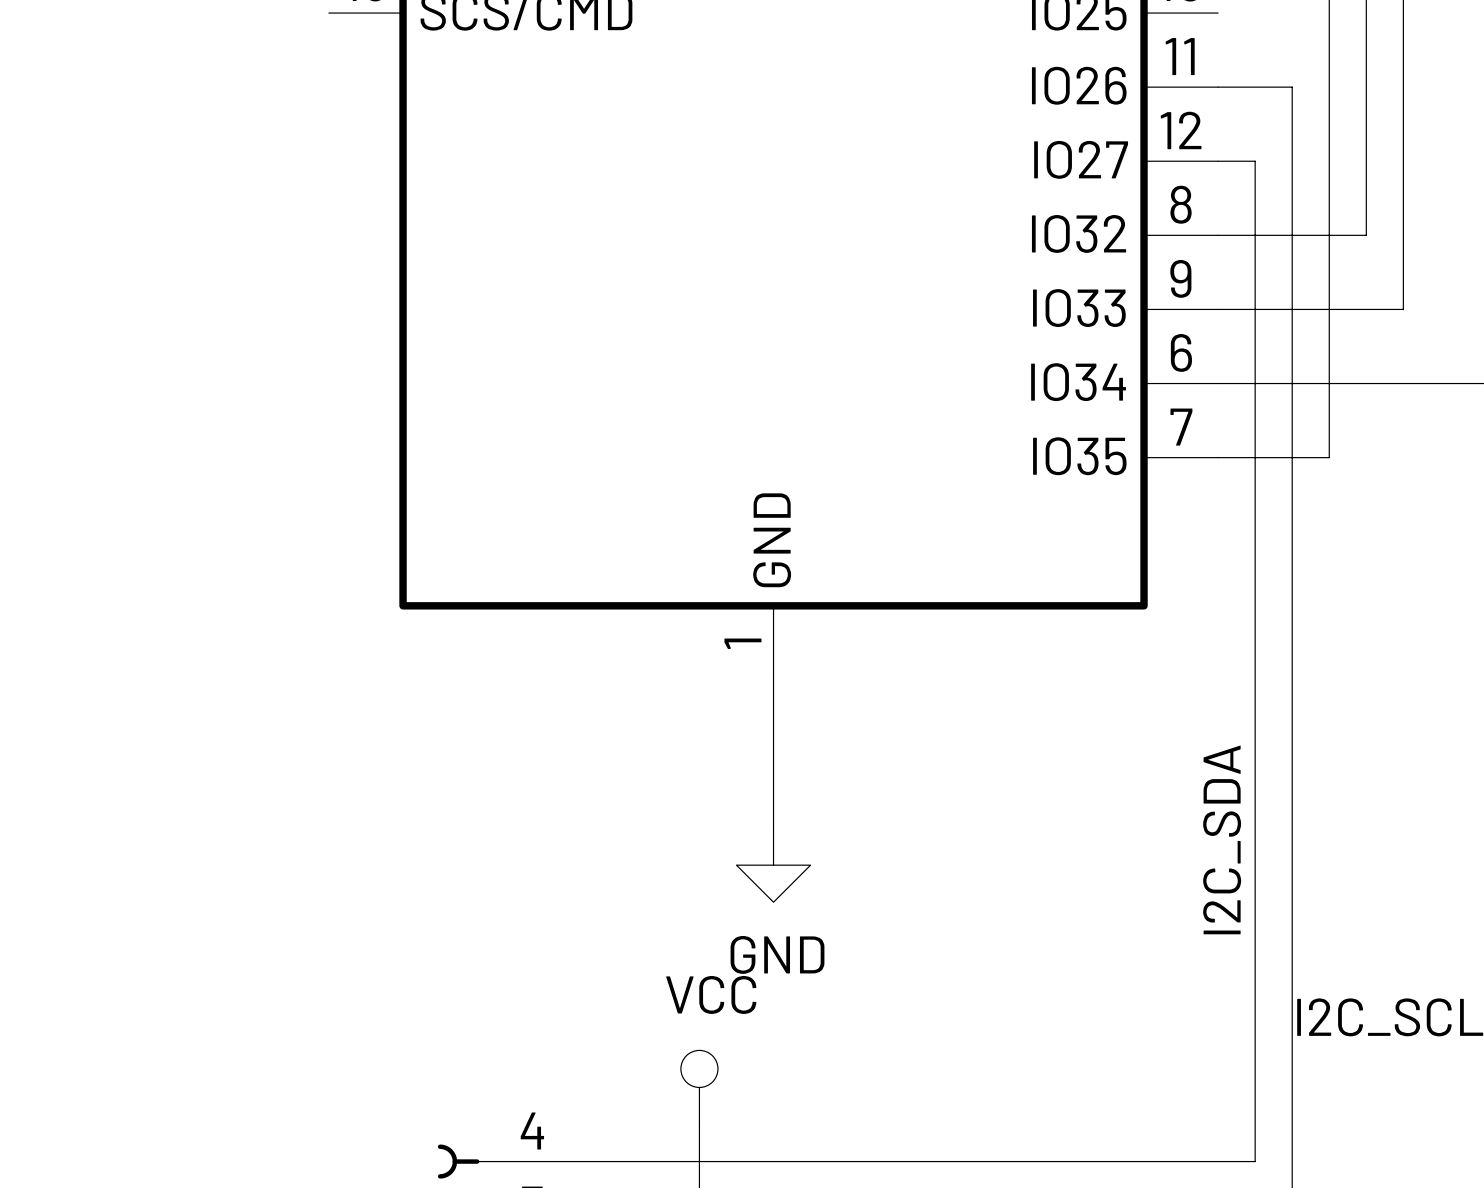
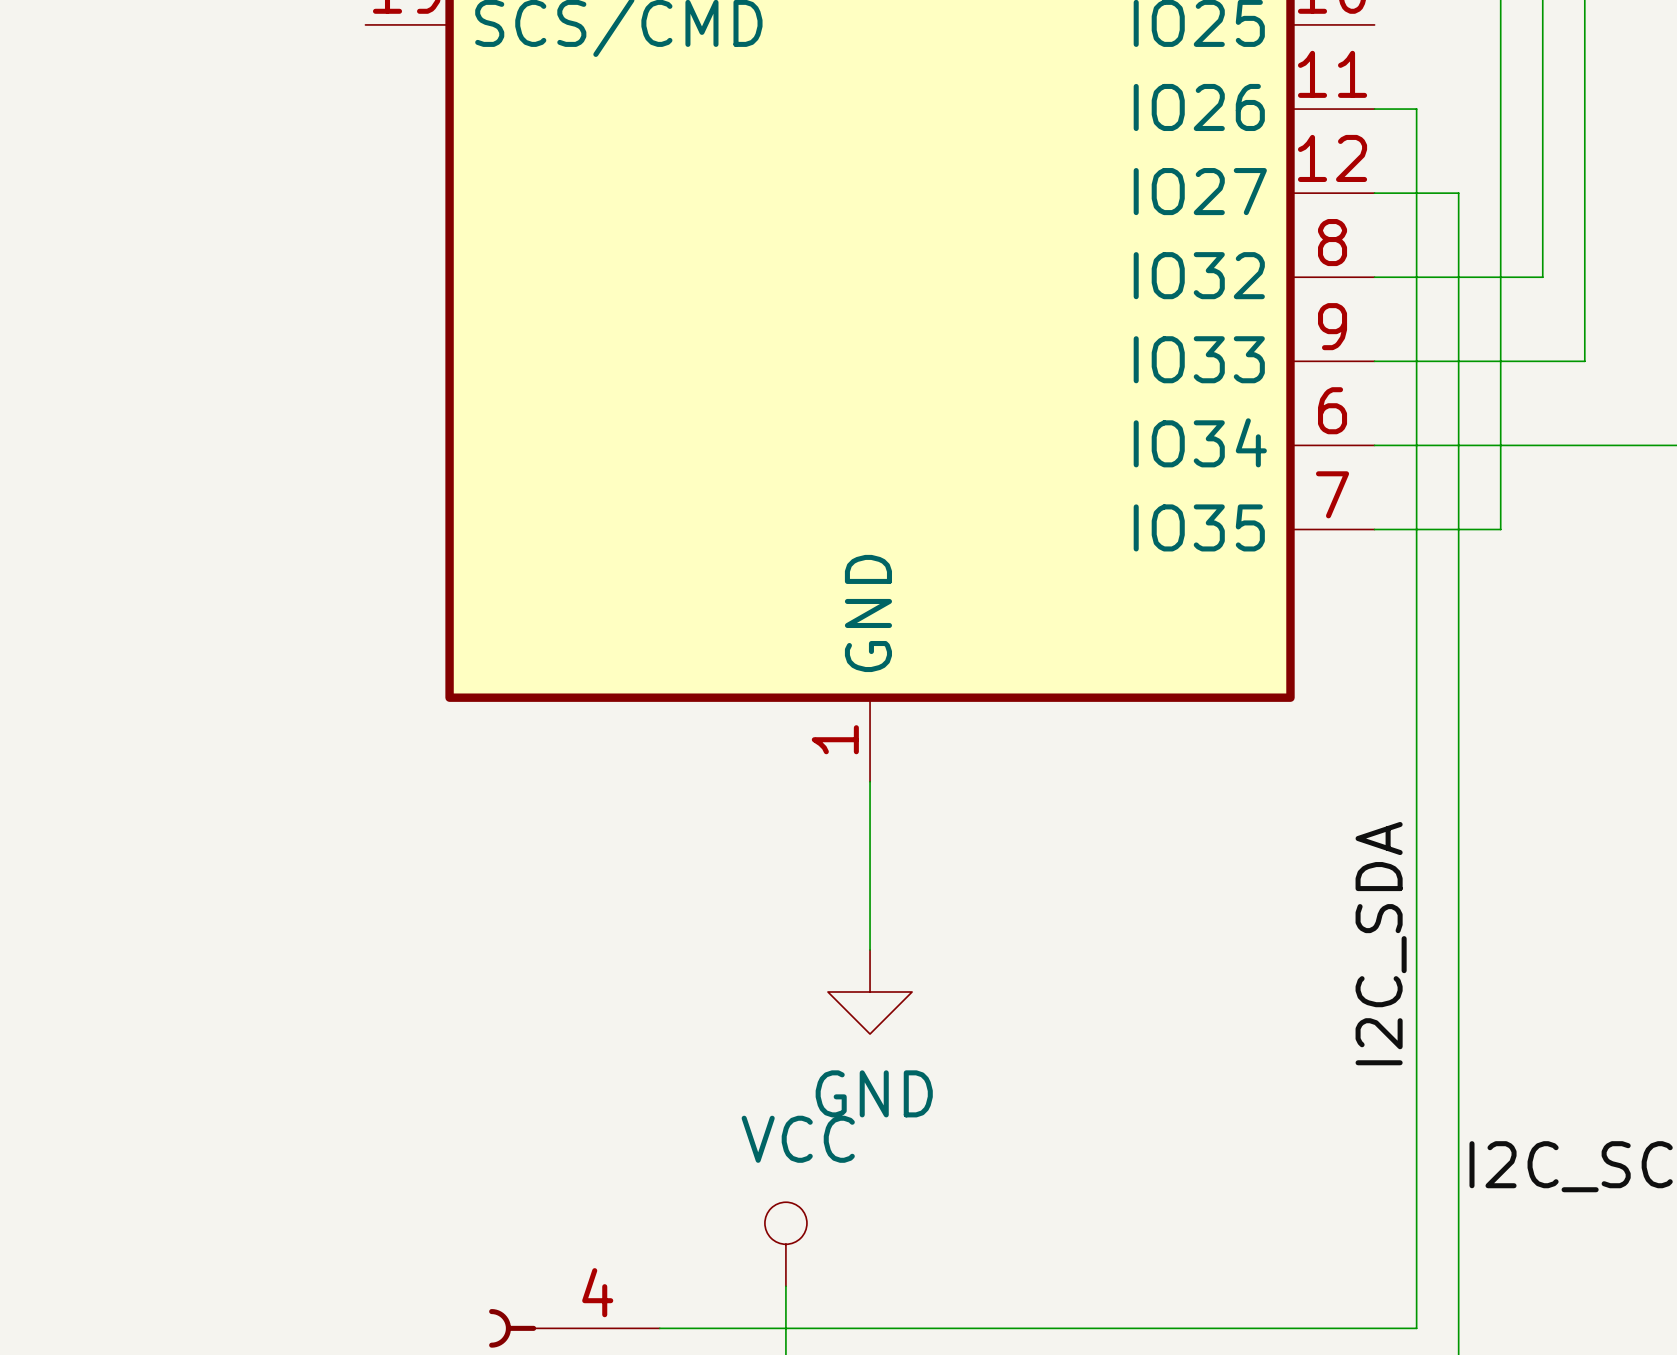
wire: (1255, 87) (1292, 87) (1292, 161) -> (1416, 109) (1416, 193) (1458, 193)

